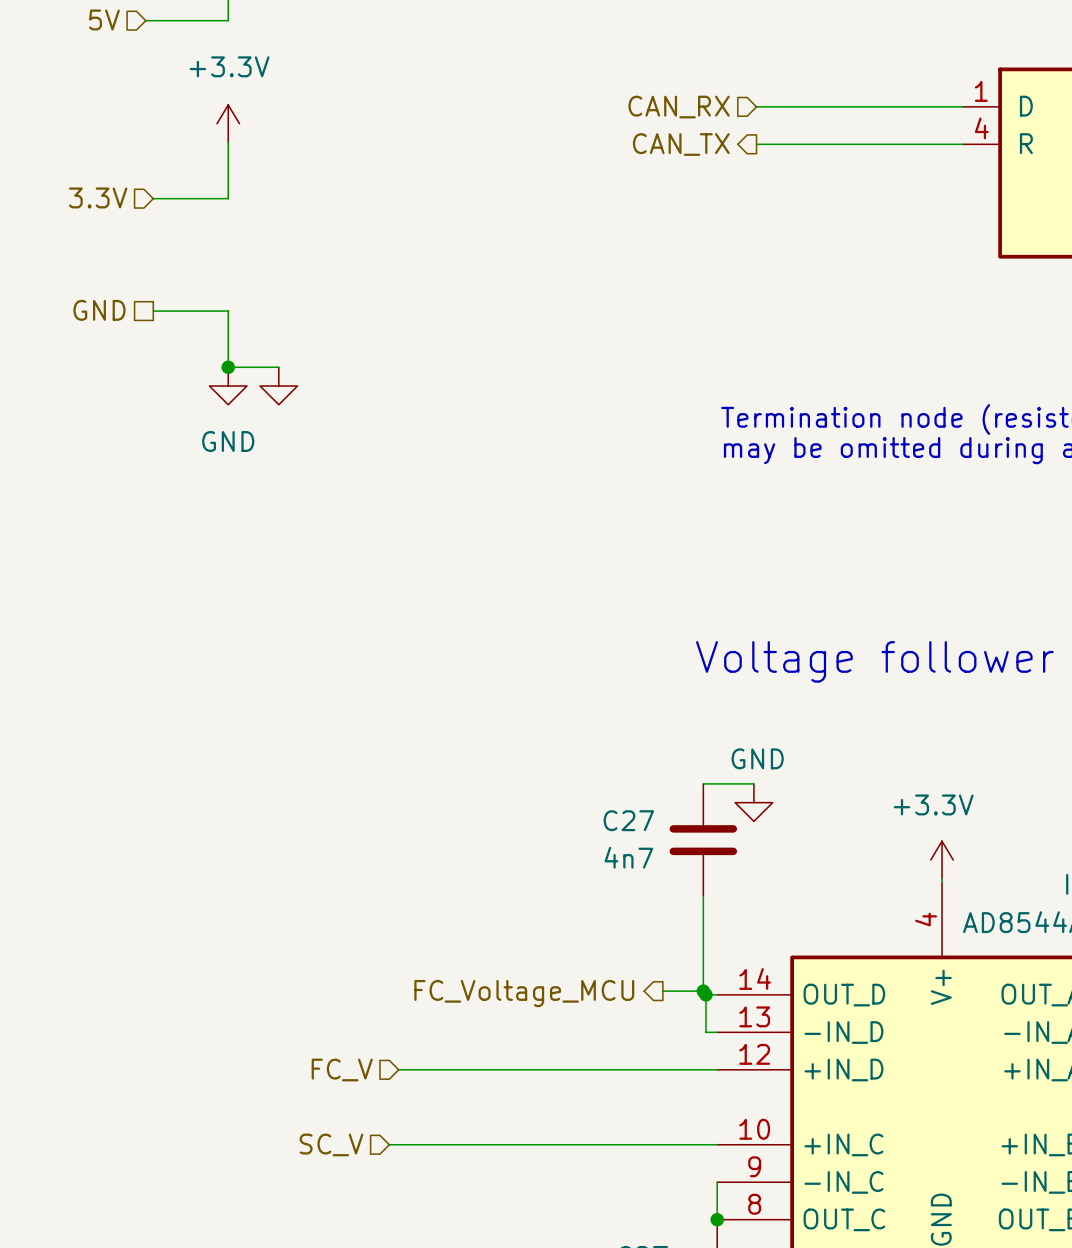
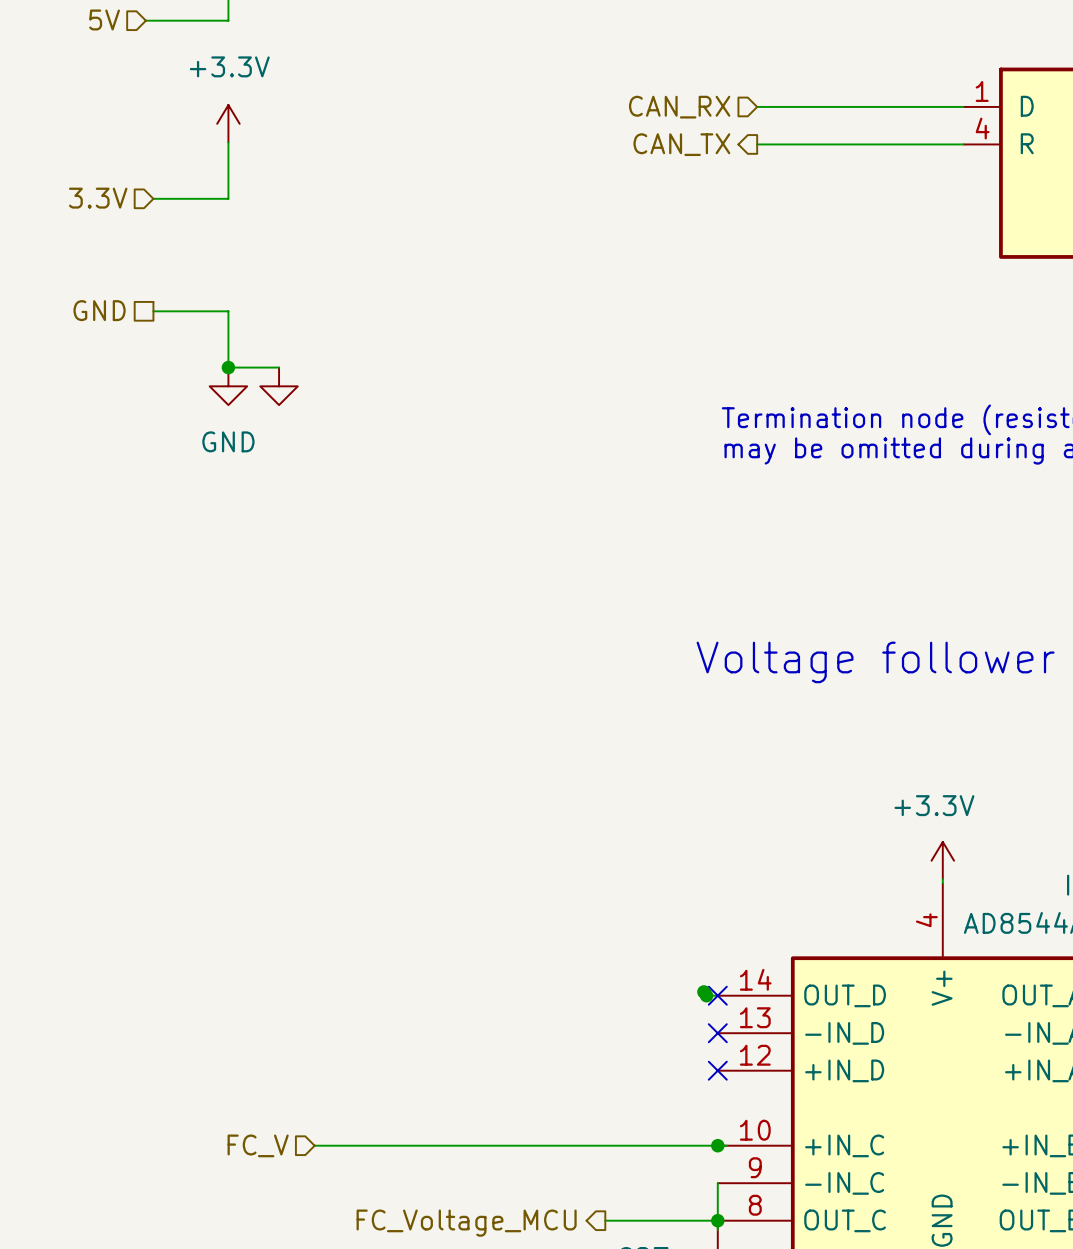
wire: (703, 783) (753, 783) -> none
power symbol: GND (753, 802) -> none
C27: 4n7 (703, 840) -> none
wire: (703, 896) (703, 991) -> none
wire: (662, 991) (705, 991) (705, 1032) (717, 1032) -> none
hierarchical label position: FC_Voltage_MCU (524, 993) -> FC_Voltage_MCU (466, 1223)
no-connect mark: none -> (717, 995)
no-connect mark: none -> (717, 1033)
wire: (398, 1069) (717, 1069) -> none
no-connect mark: none -> (717, 1070)
hierarchical label position: FC_V (342, 1070) -> FC_V (258, 1145)
wire: none -> (314, 1145) (389, 1145)
hierarchical label: SC_V (331, 1144) -> none
junction: none -> (717, 1145)
wire: none -> (605, 1220) (717, 1220) (717, 1230)

